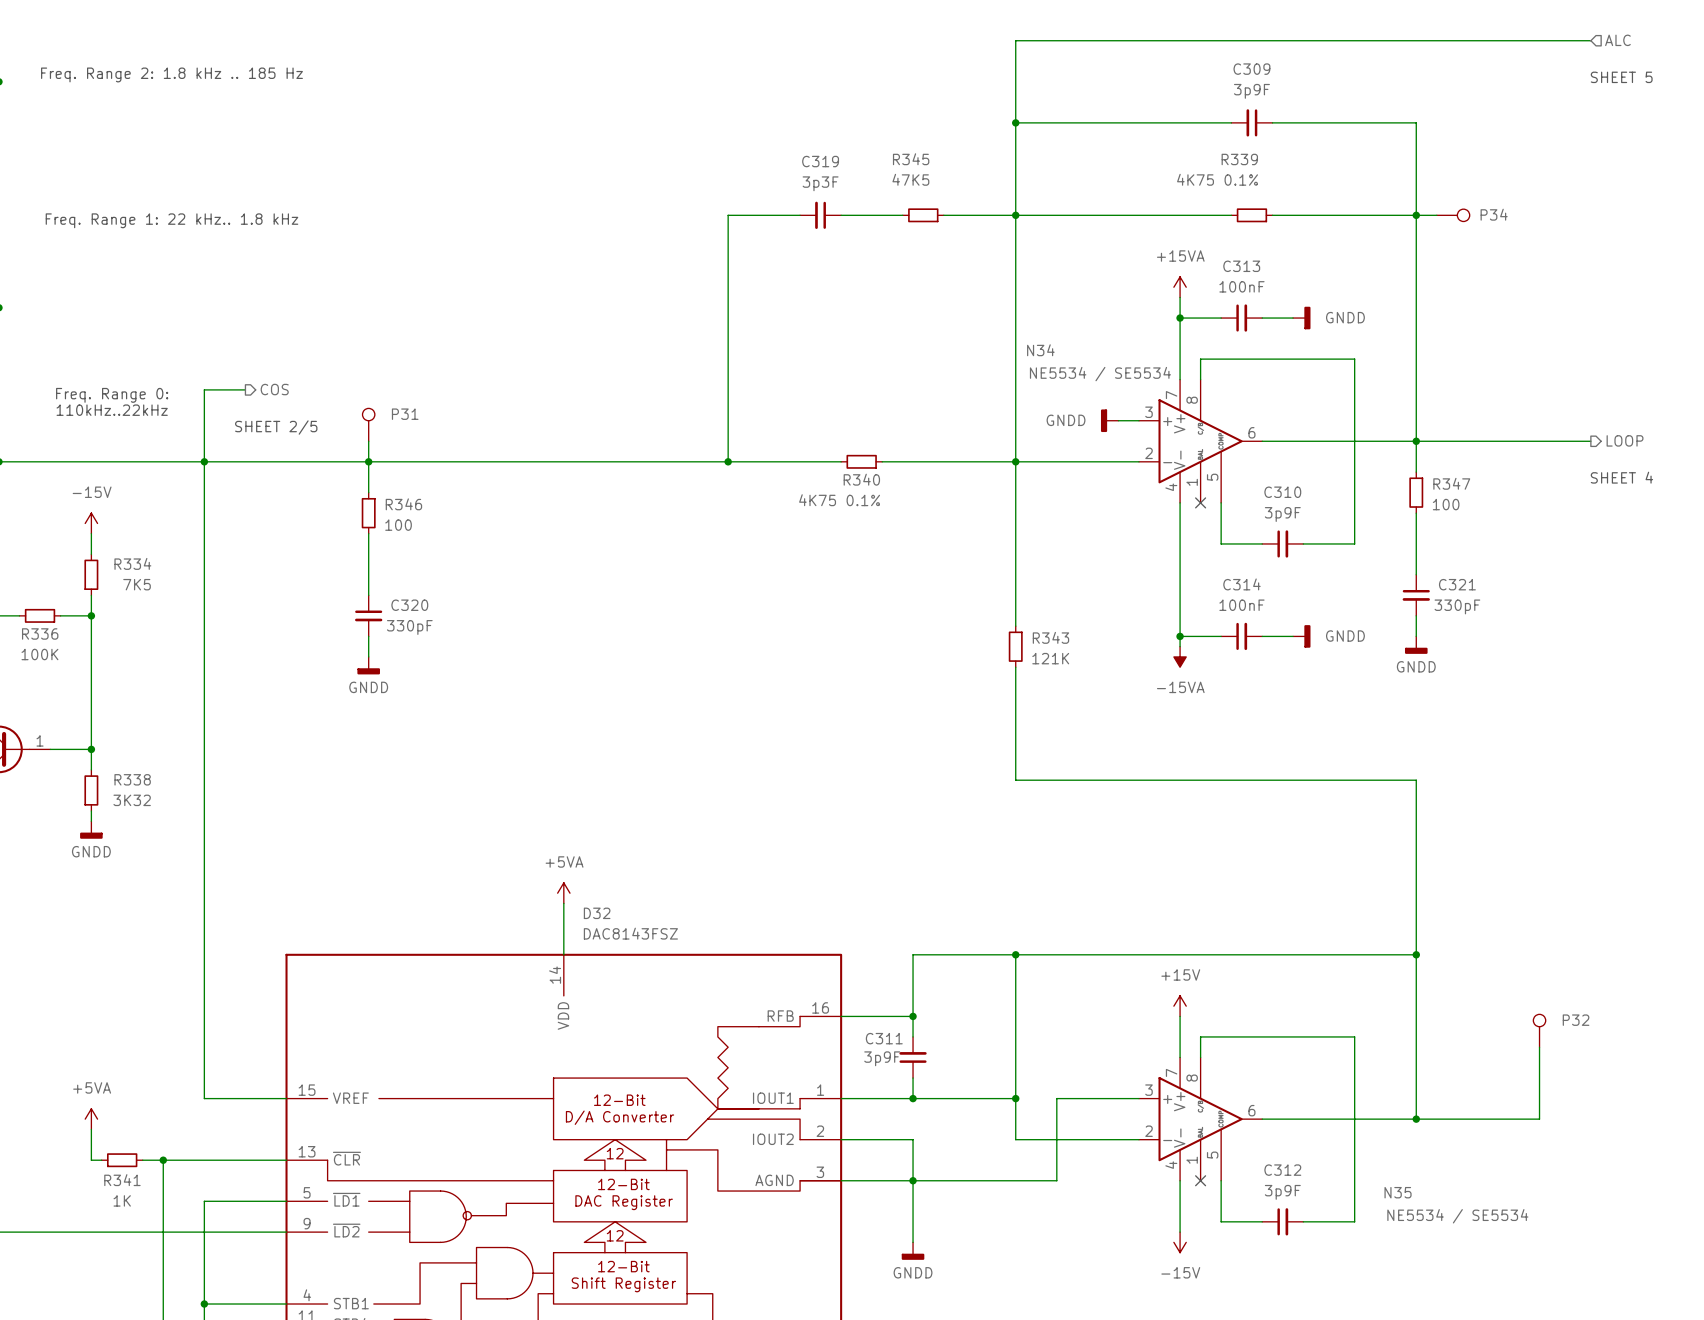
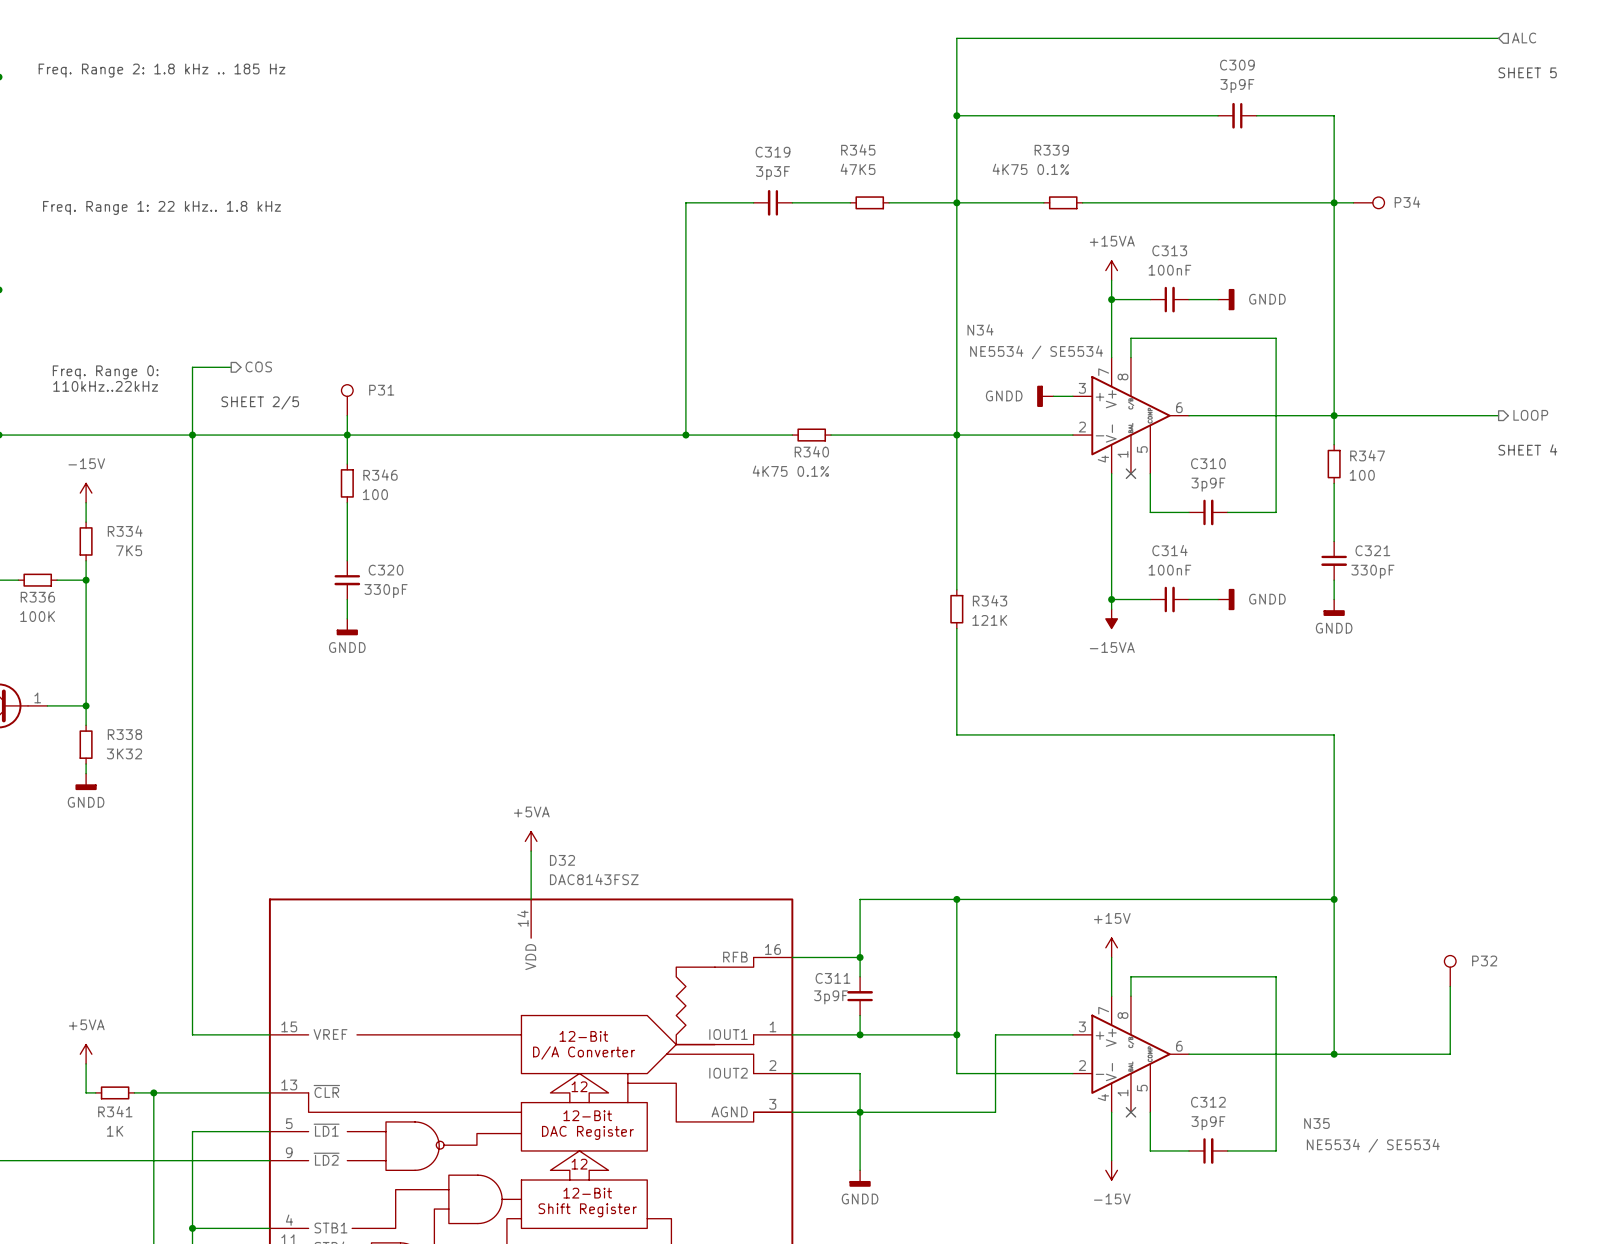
C309 position: (1251, 122) -> (1237, 115)
wire: (1108, 215) (1149, 215) -> (1160, 202) (1198, 202)
R339 position: (1251, 215) -> (1063, 202)

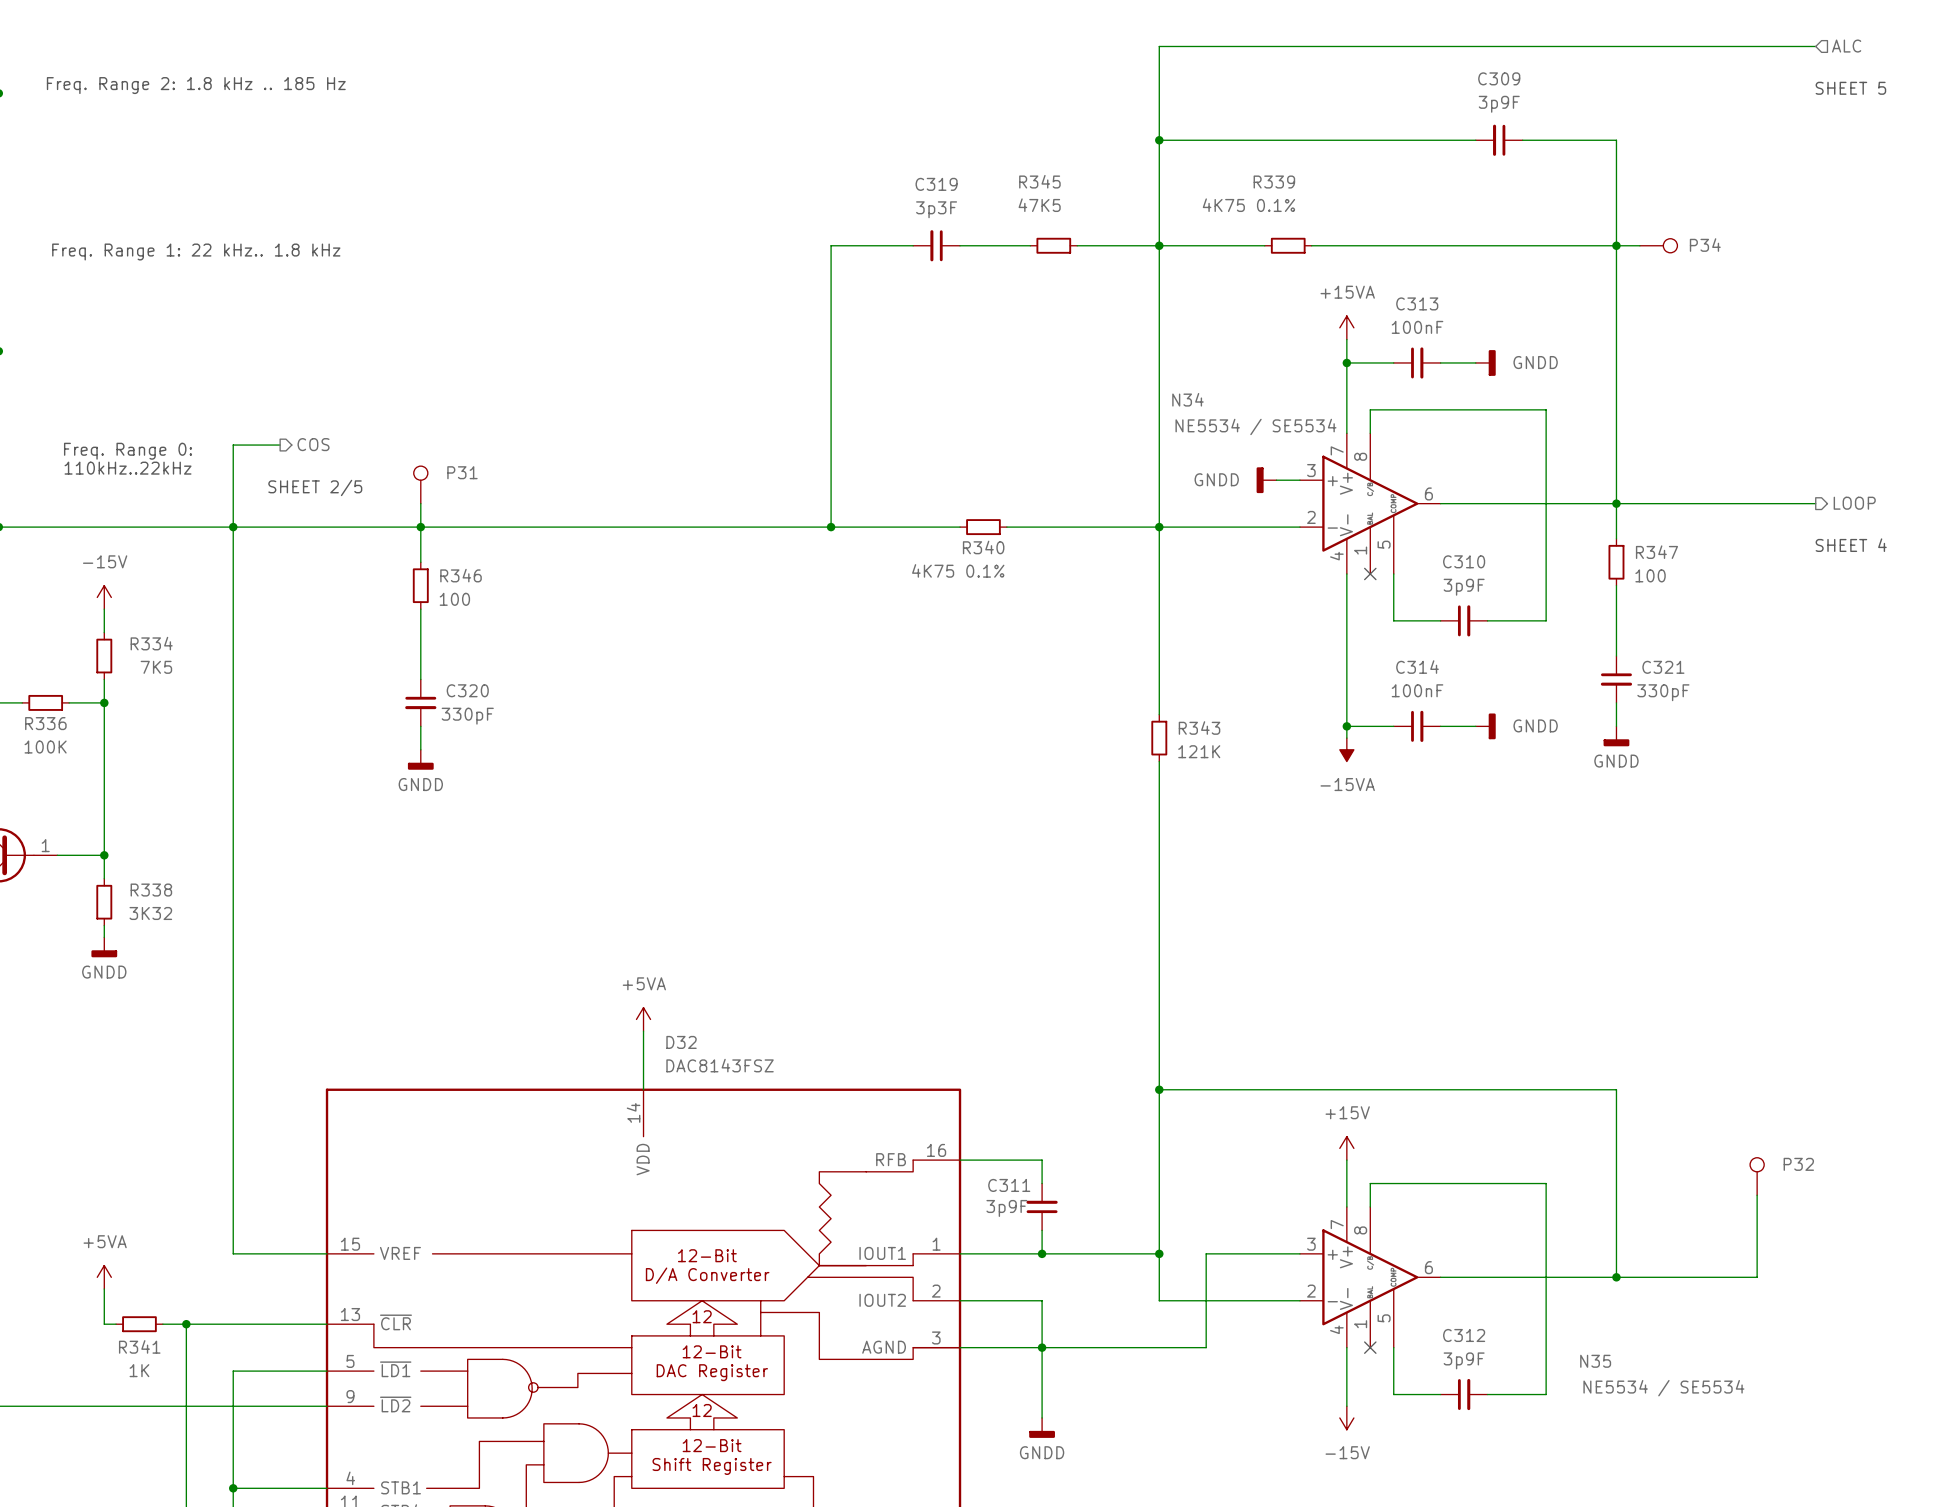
wire: (956, 734) (1334, 734) (1334, 899) -> none
wire: (956, 899) (860, 899) (860, 957) -> (1159, 1089) (1159, 890)
junction: (1334, 899) -> none
junction: (860, 957) -> none

